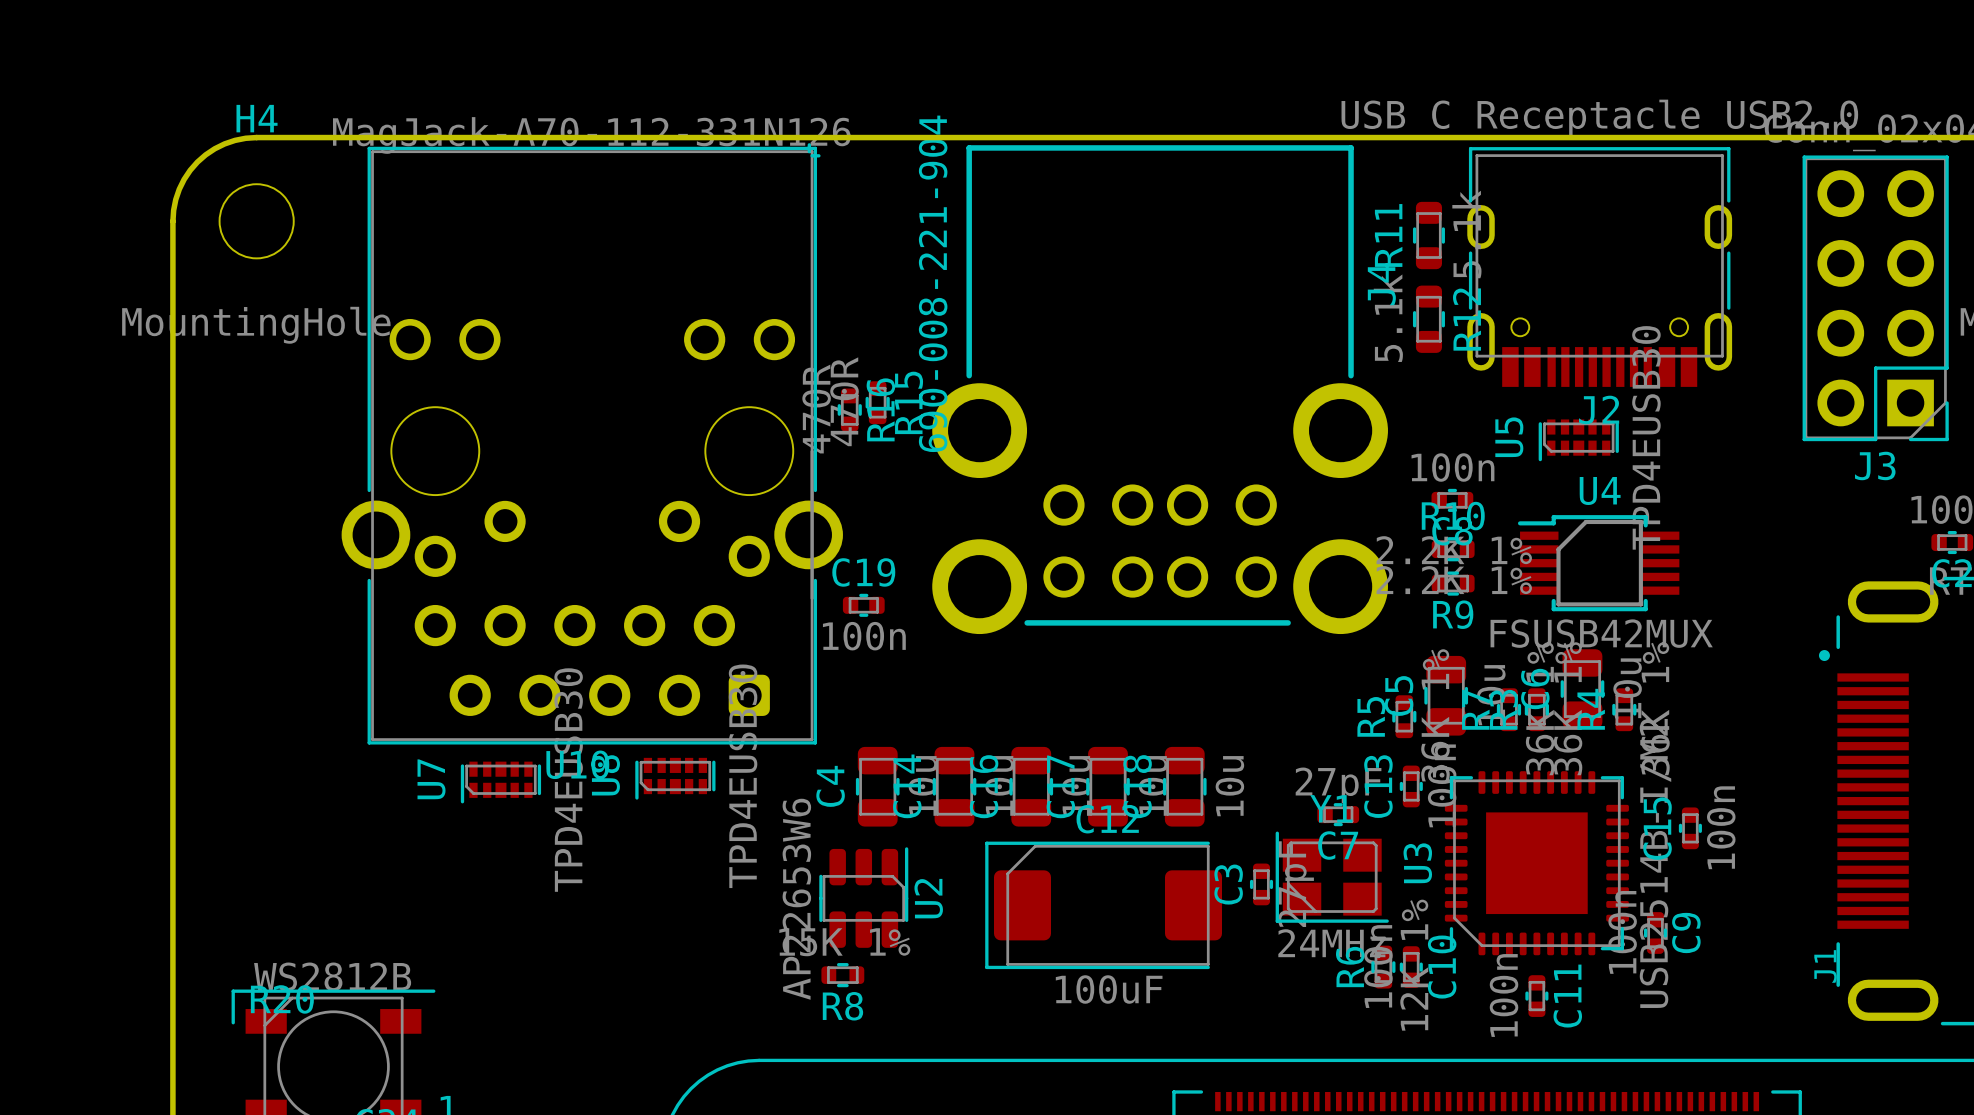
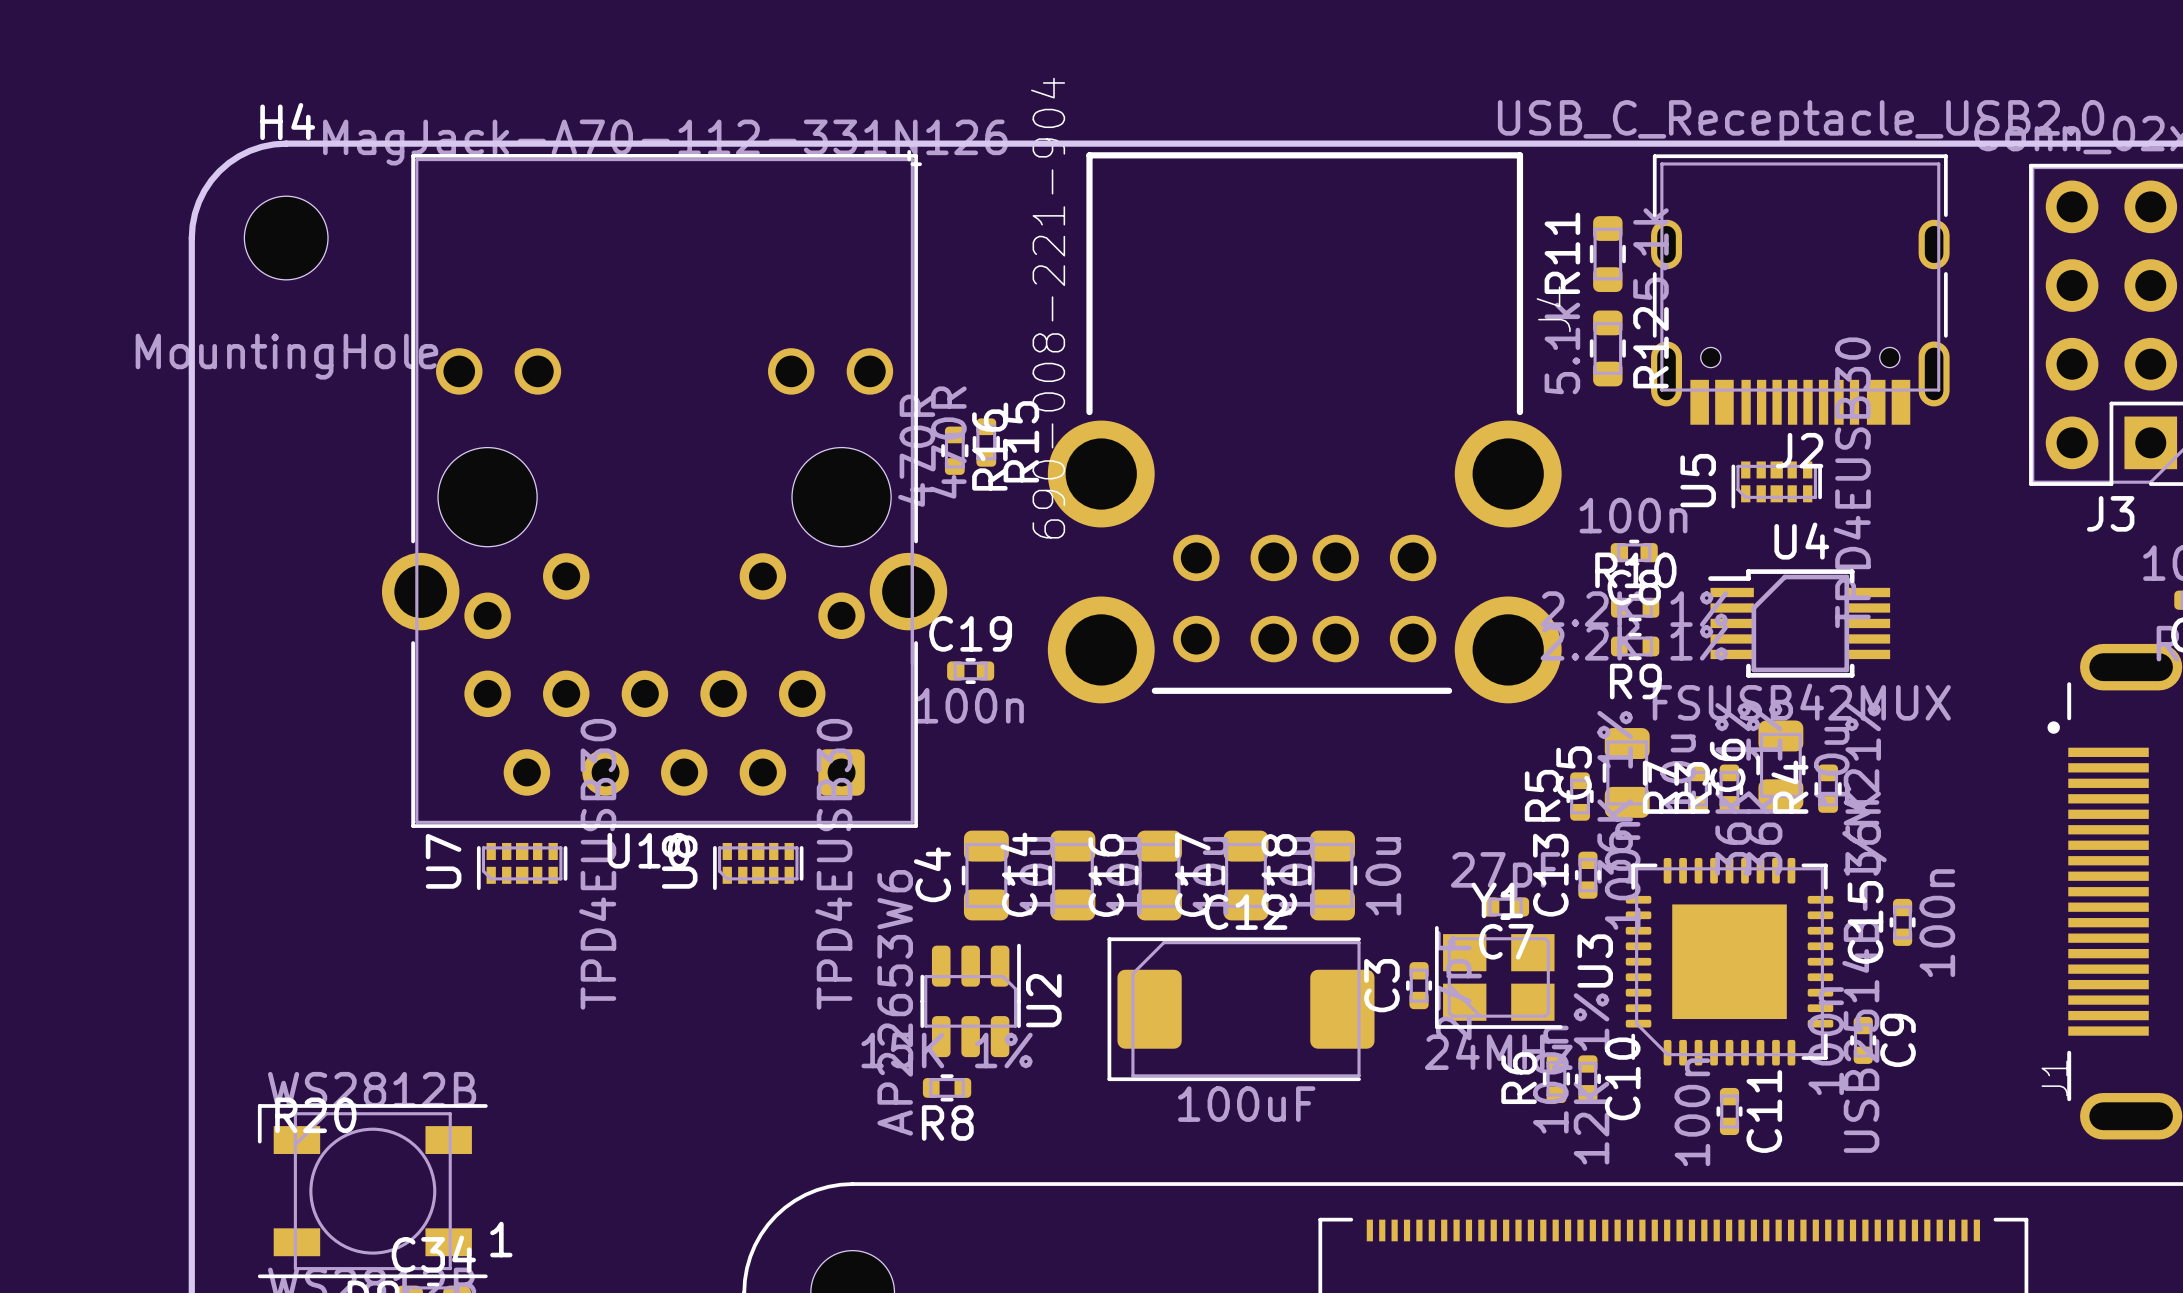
U7 position: (500, 782) -> (522, 866)

